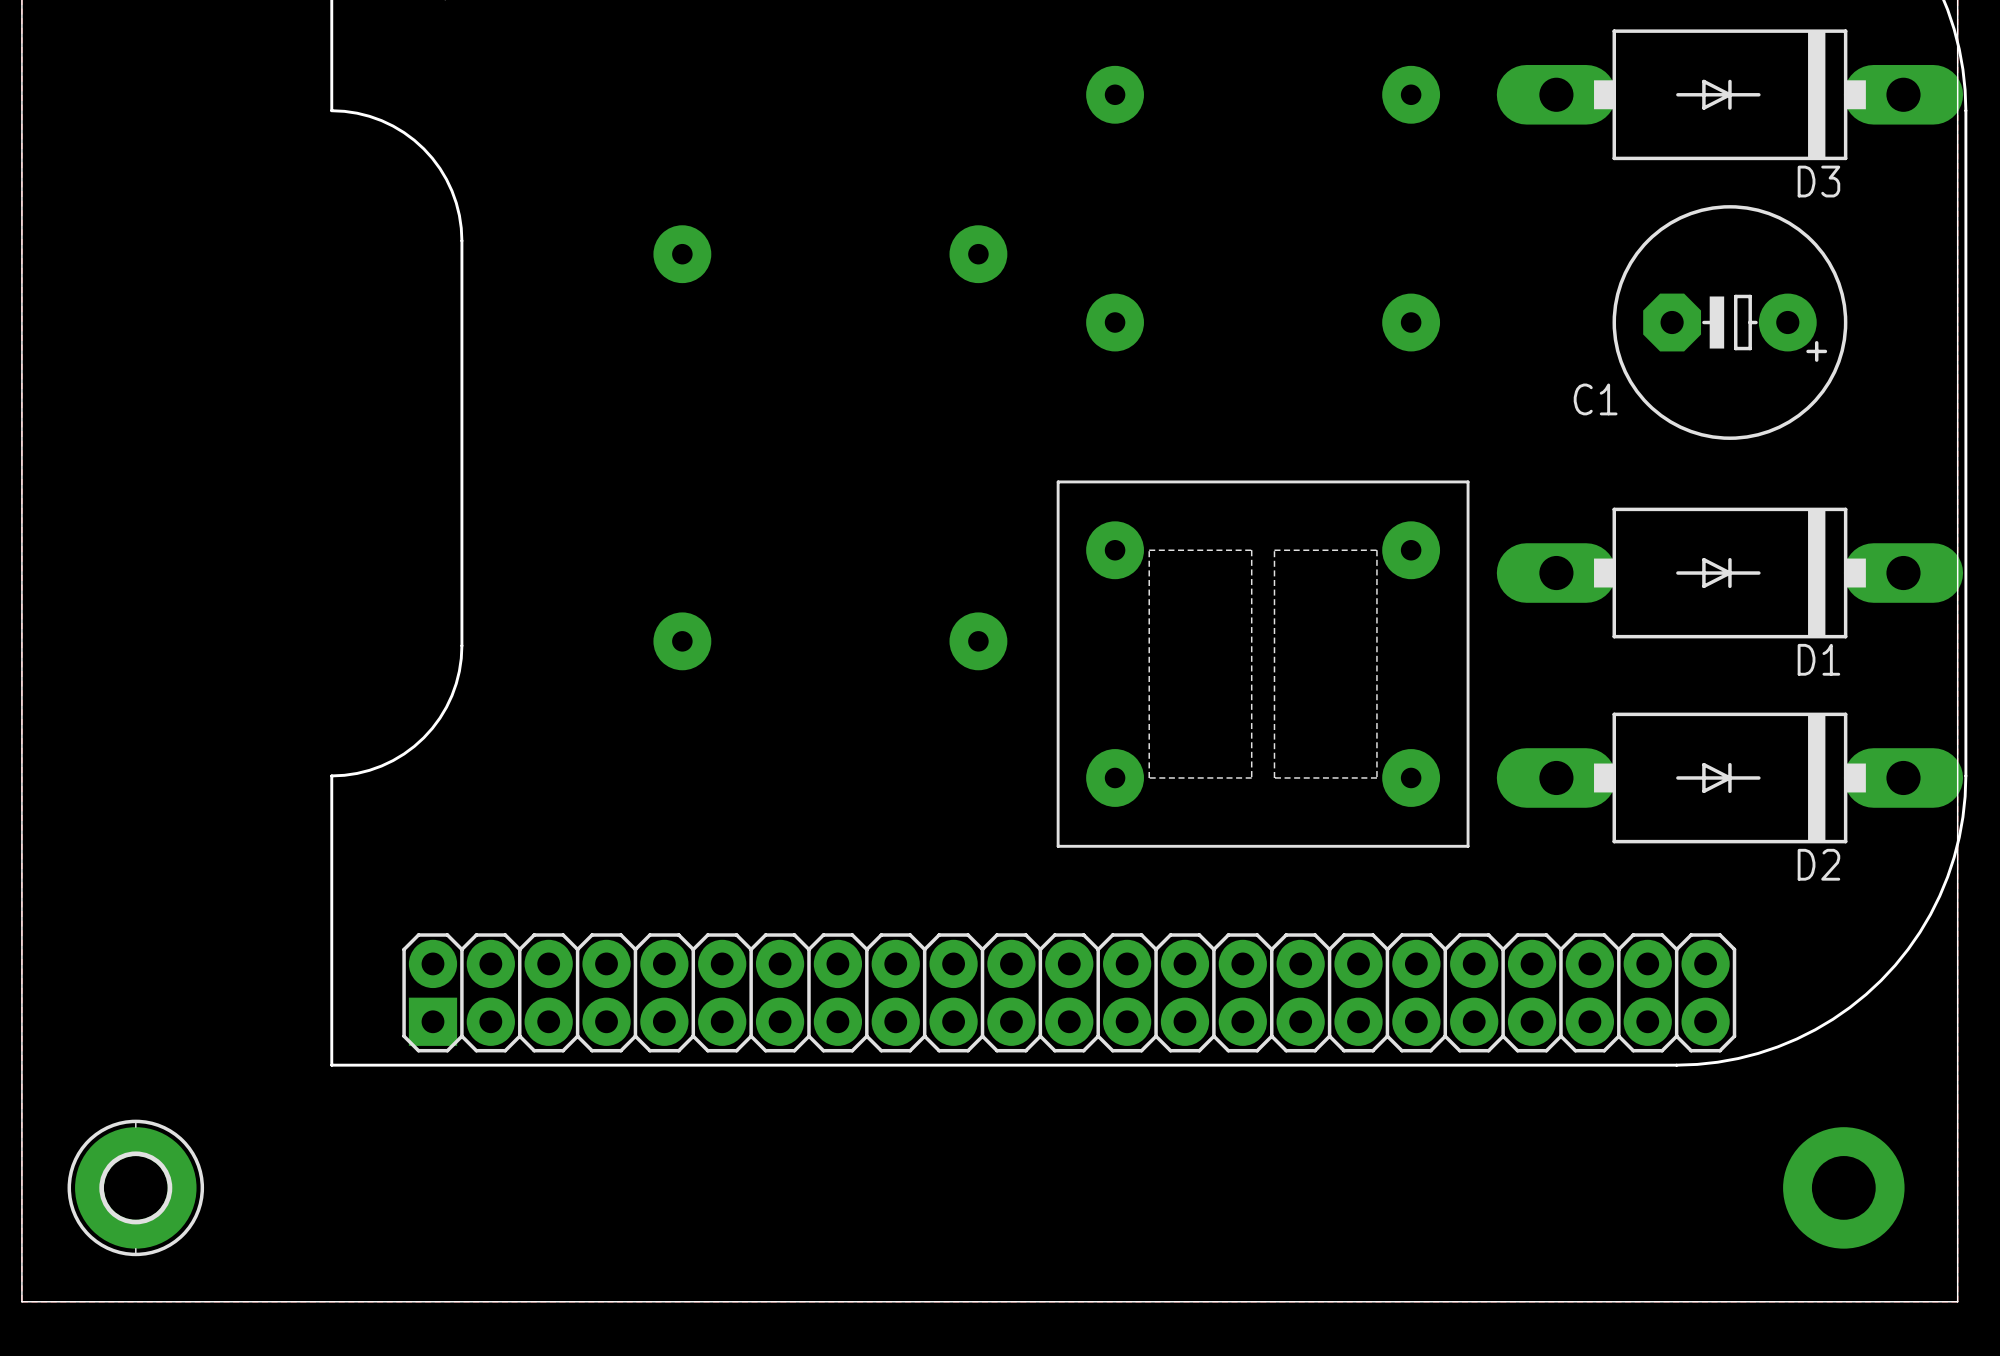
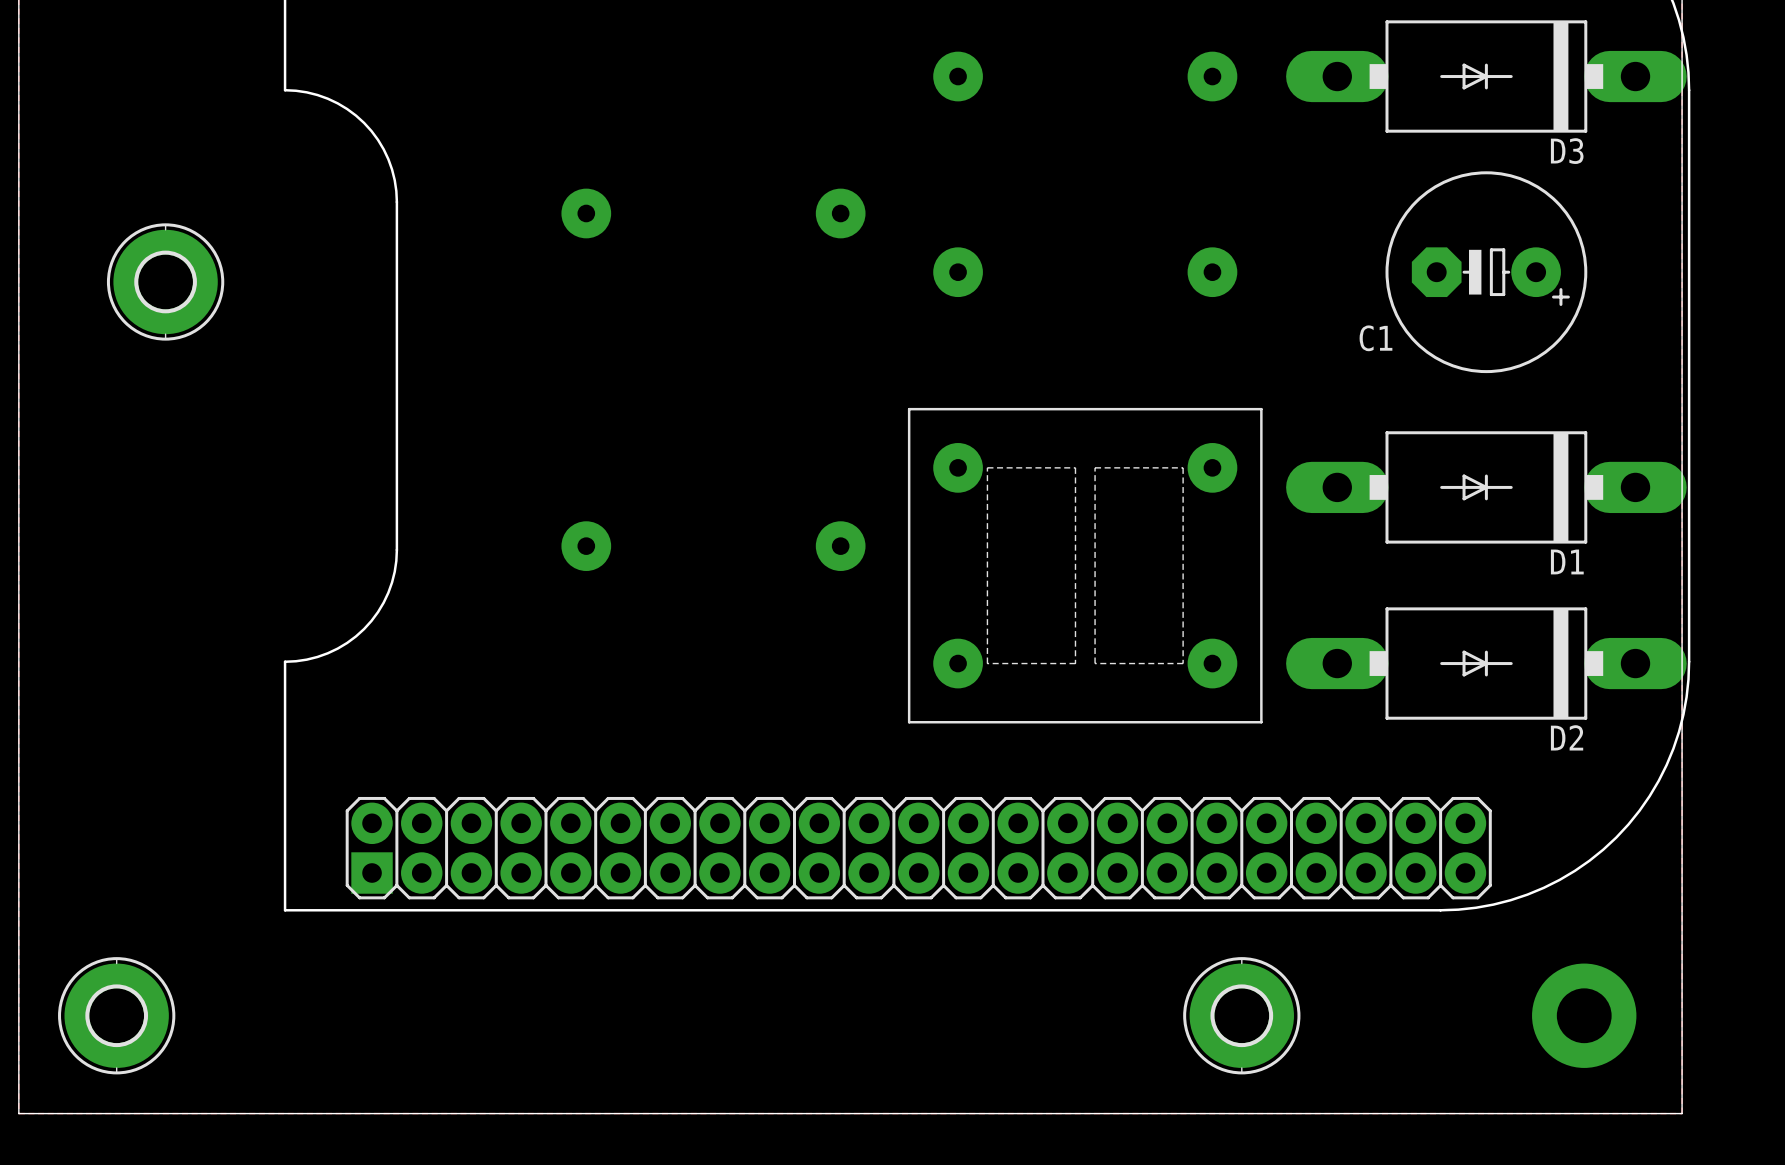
part: none -> (165, 281)
part: none -> (1241, 1015)

